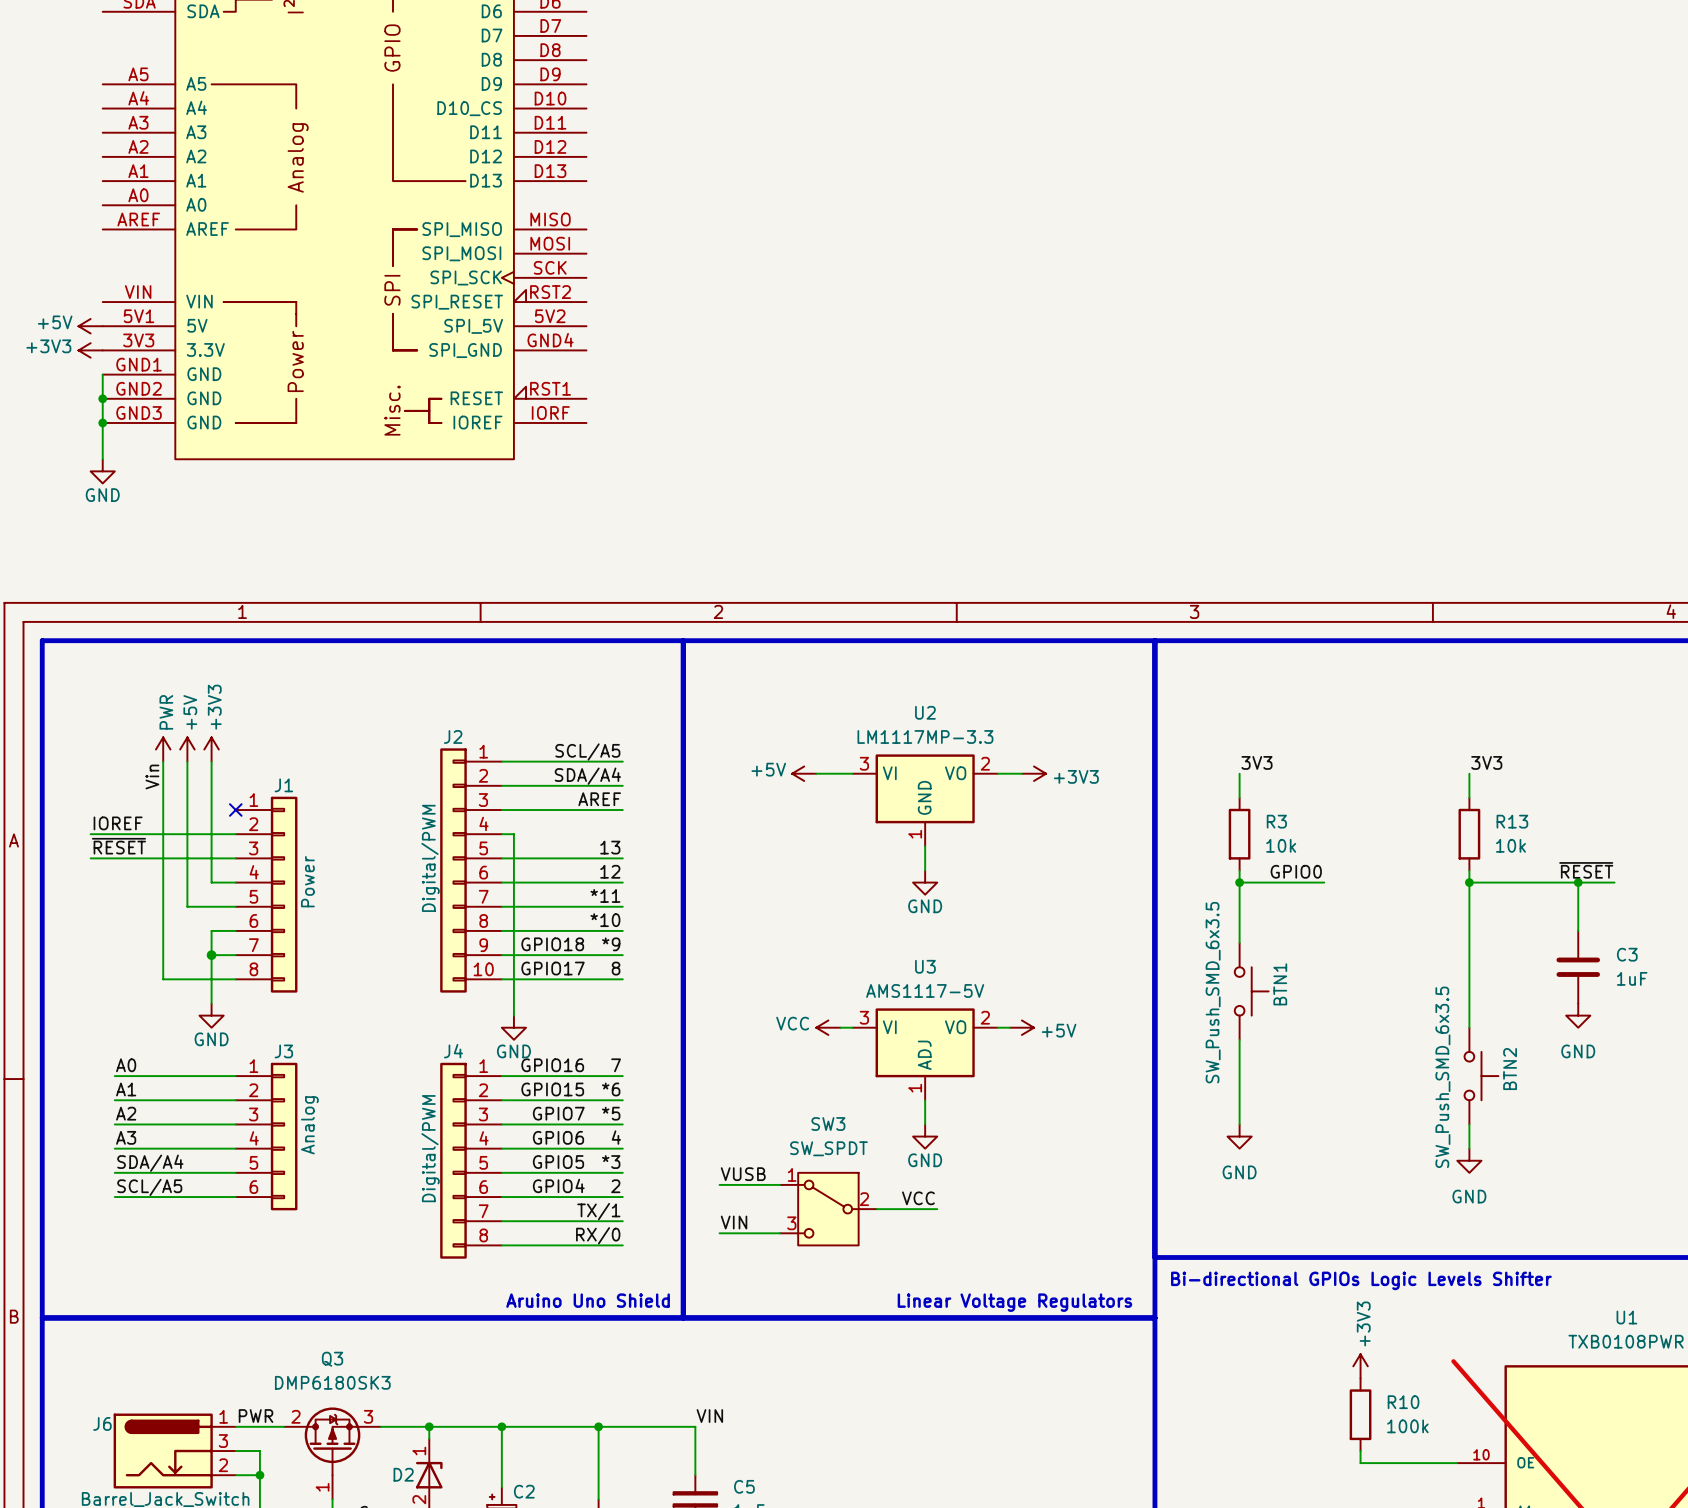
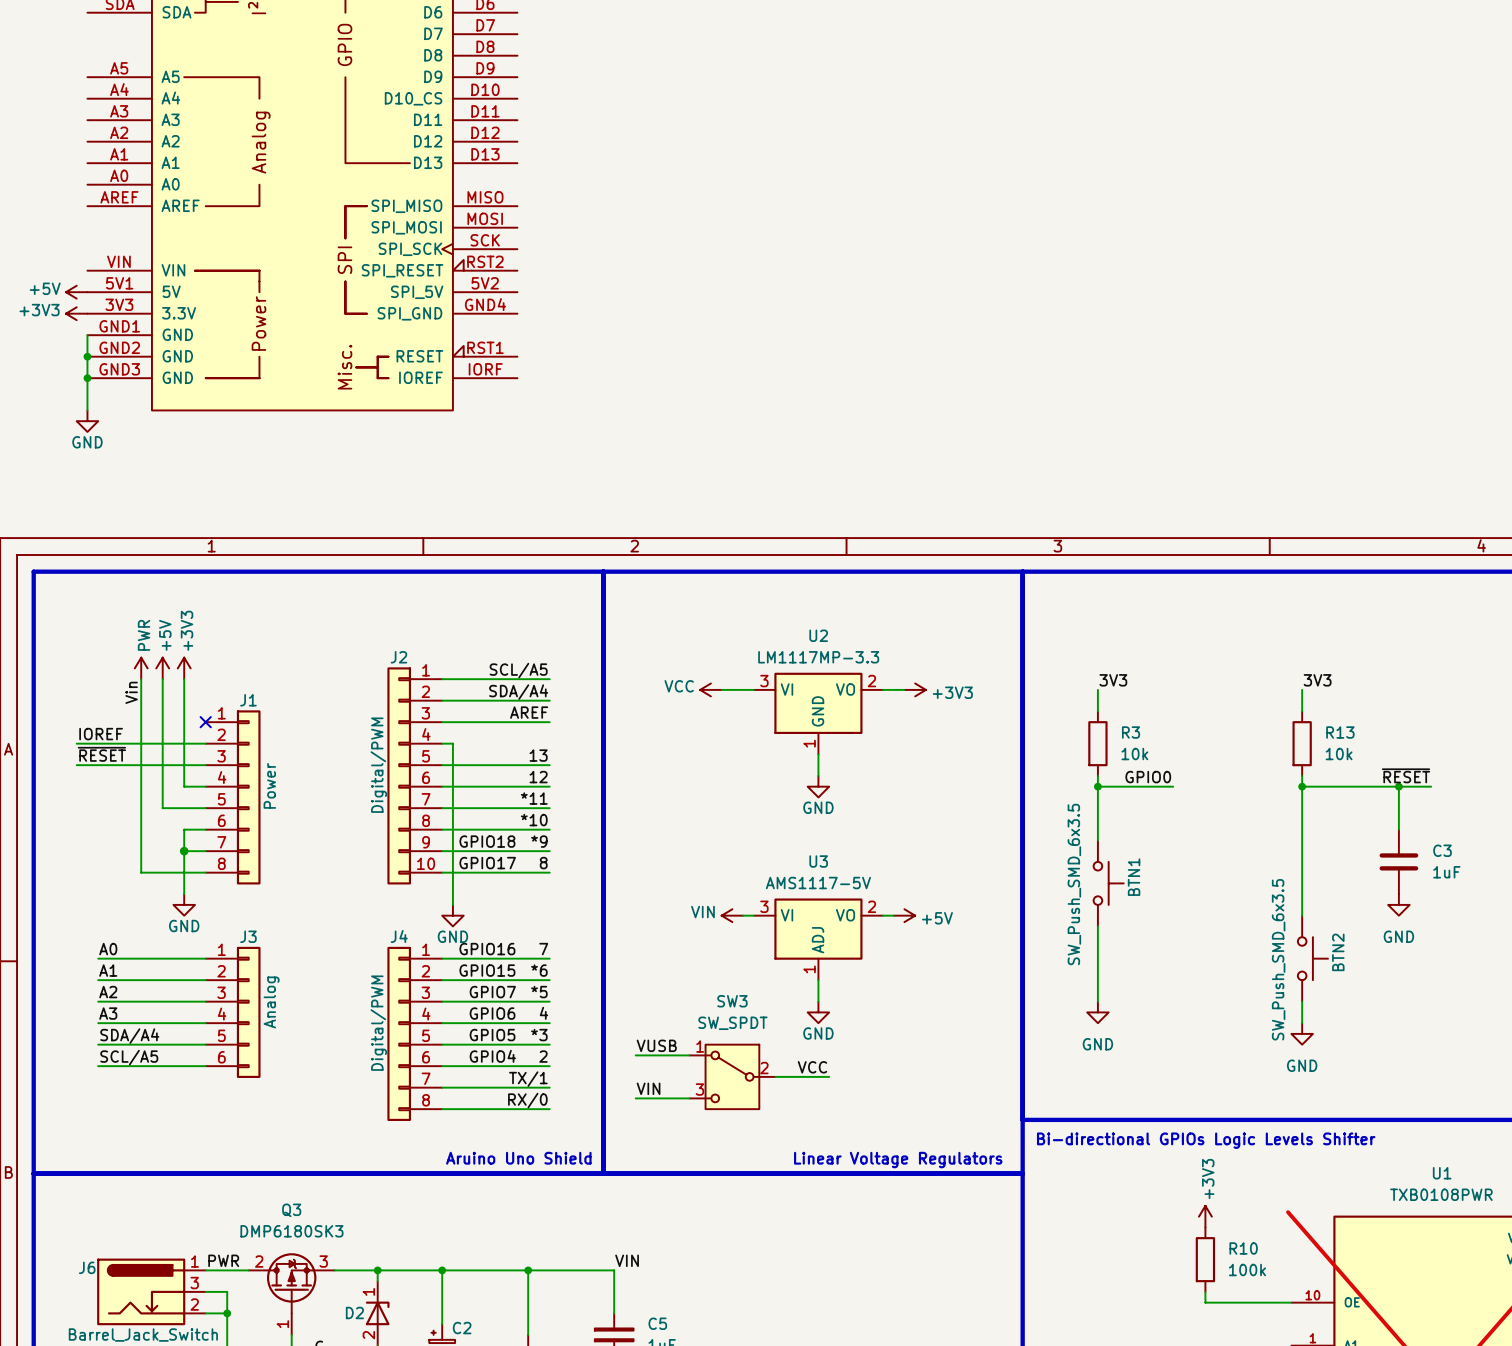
power symbol: +5V (804, 773) -> VCC (710, 689)
power symbol: VCC (828, 1027) -> VIN (732, 915)

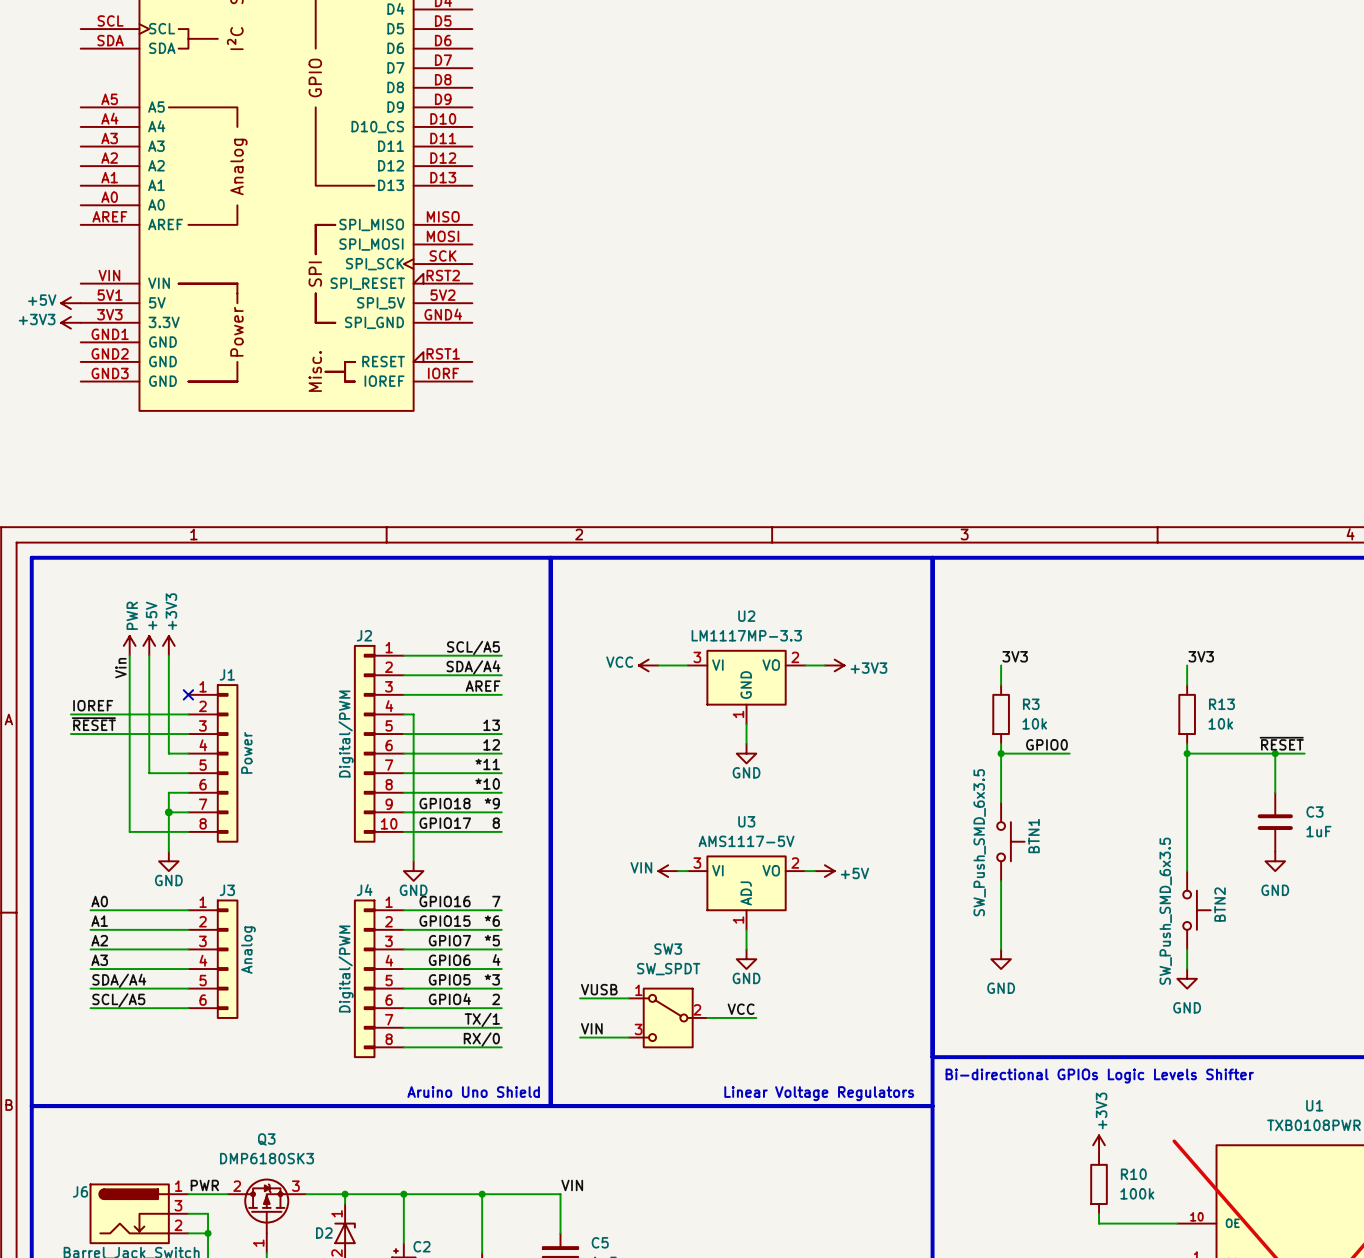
wire: (87, 335) (87, 410) -> none
junction: (87, 356) -> none
junction: (87, 378) -> none
power symbol: GND (87, 421) -> none

